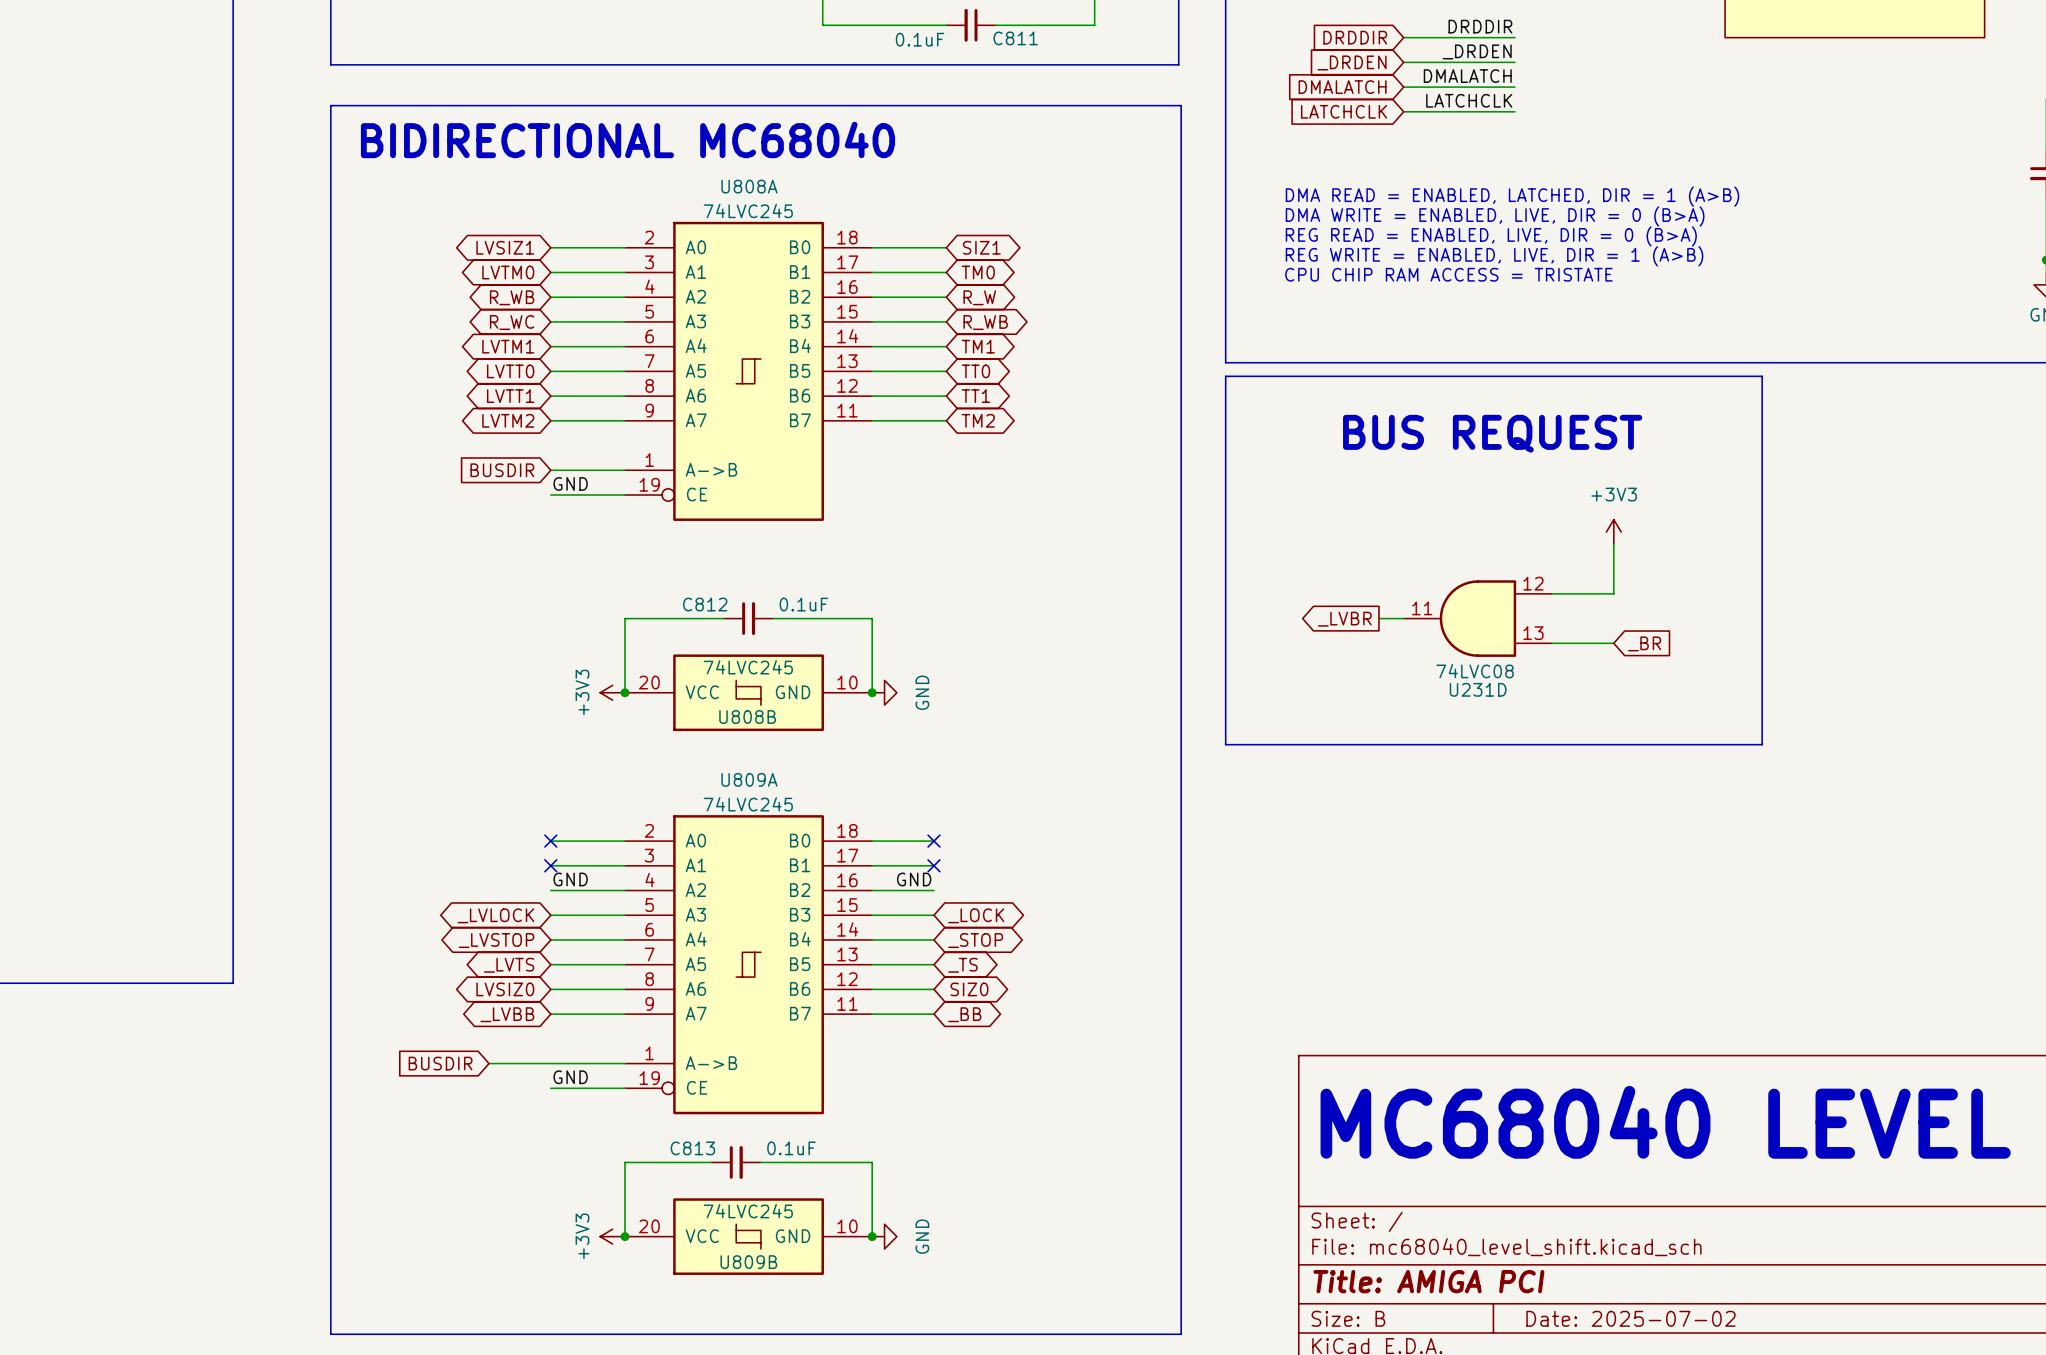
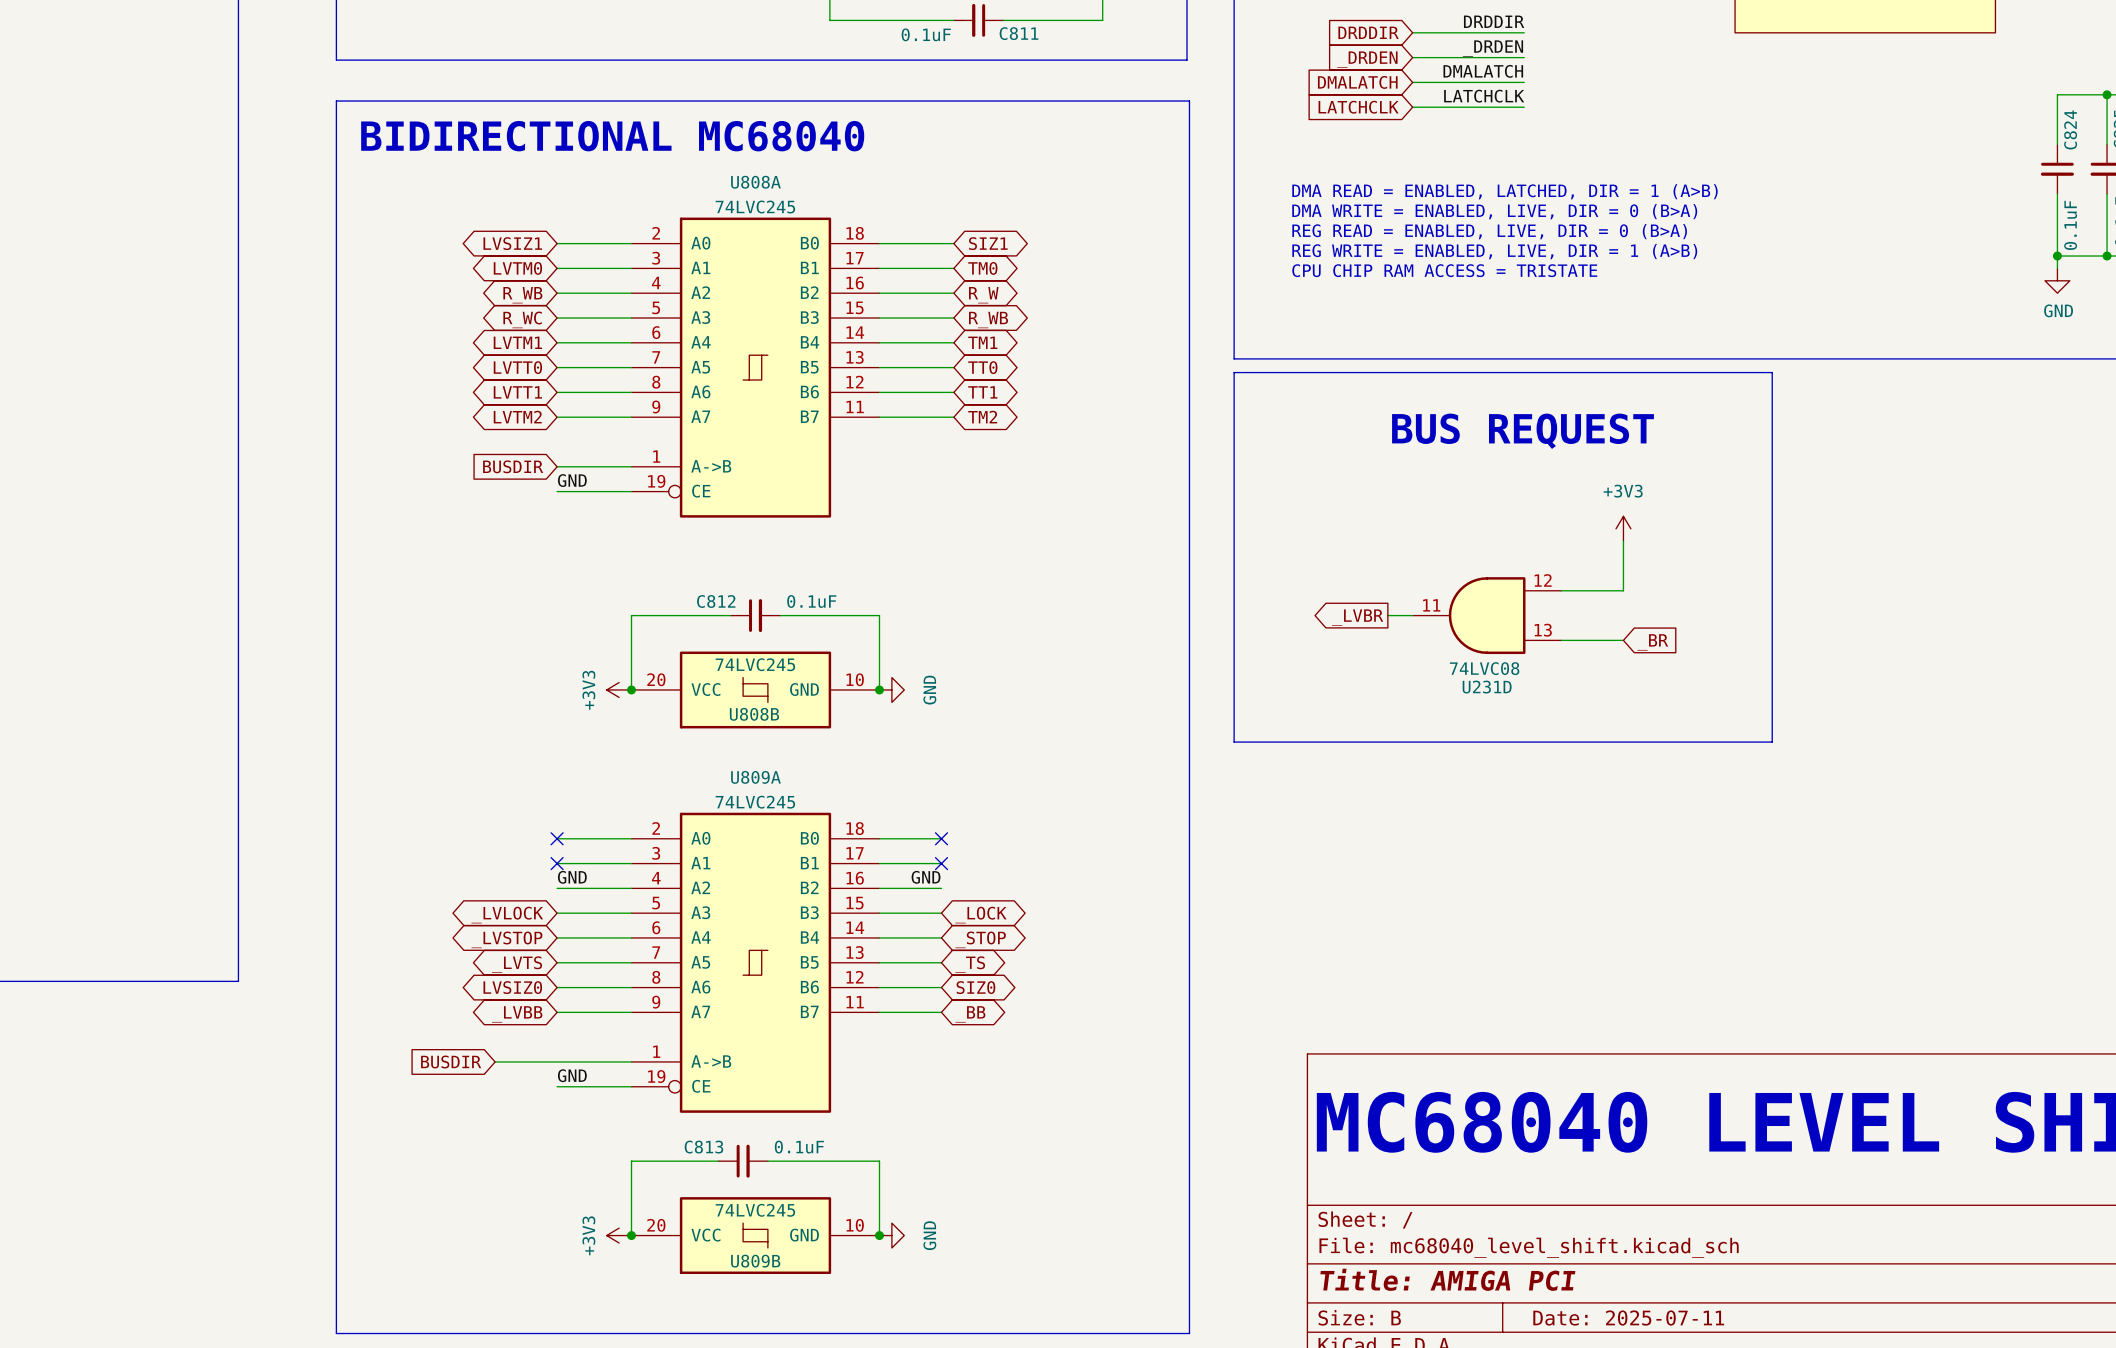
title block: Date: 2025-07-02 (1631, 1318) -> Date: 2025-07-11 (1628, 1318)

